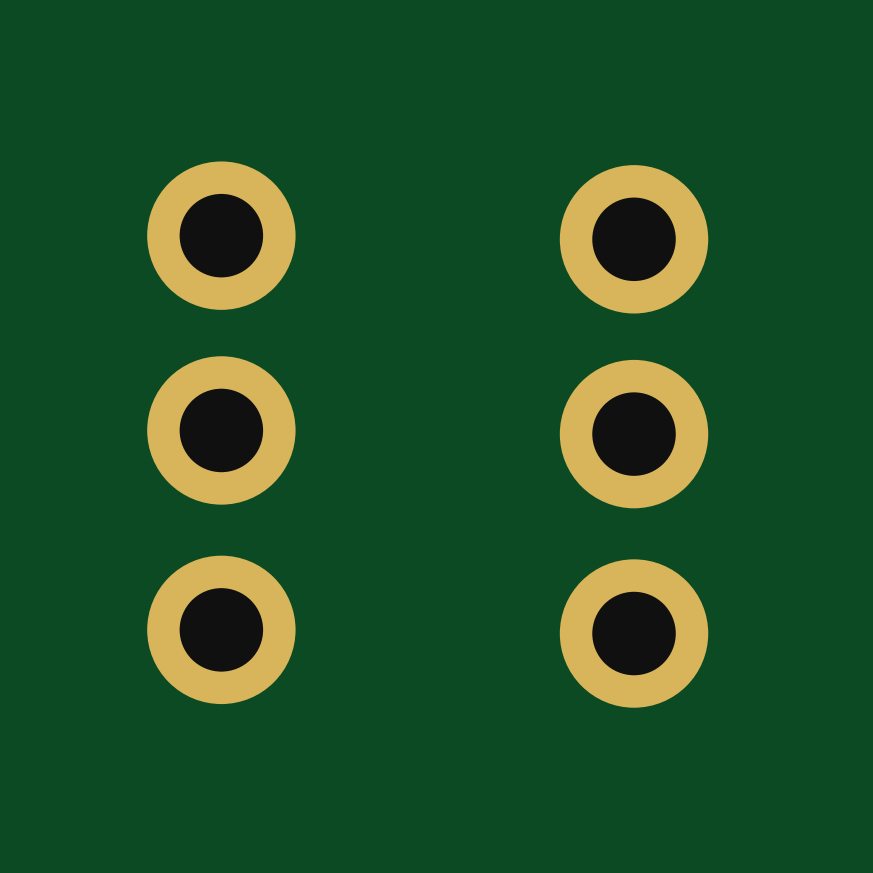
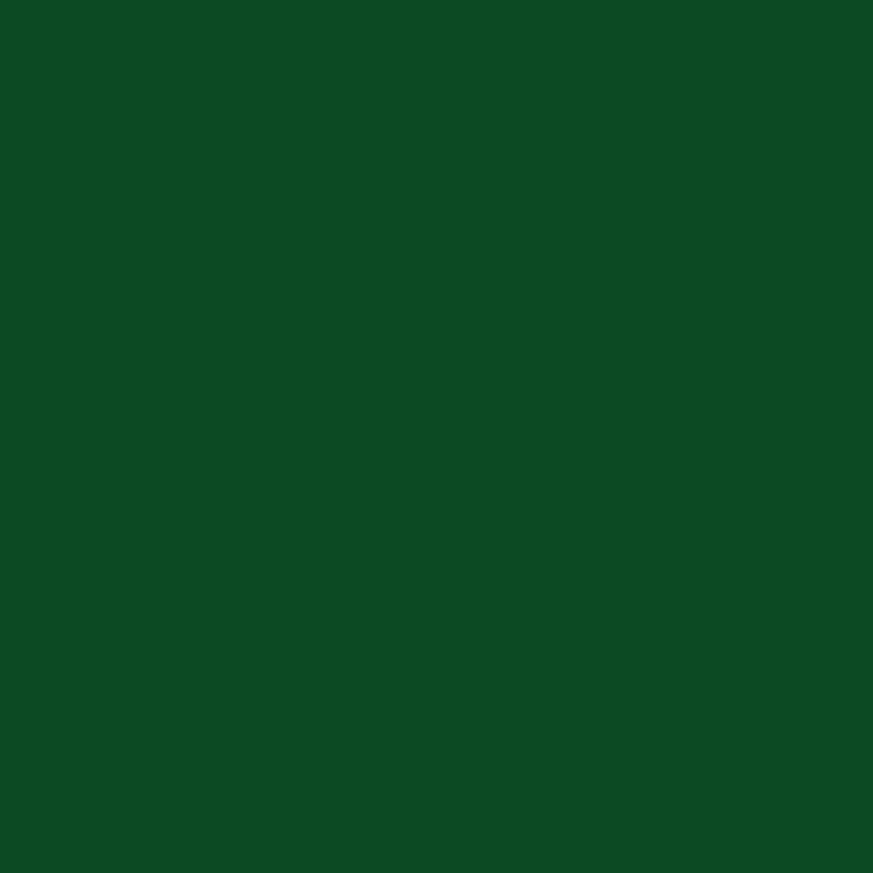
part: (221, 432) -> none
part: (634, 436) -> none

